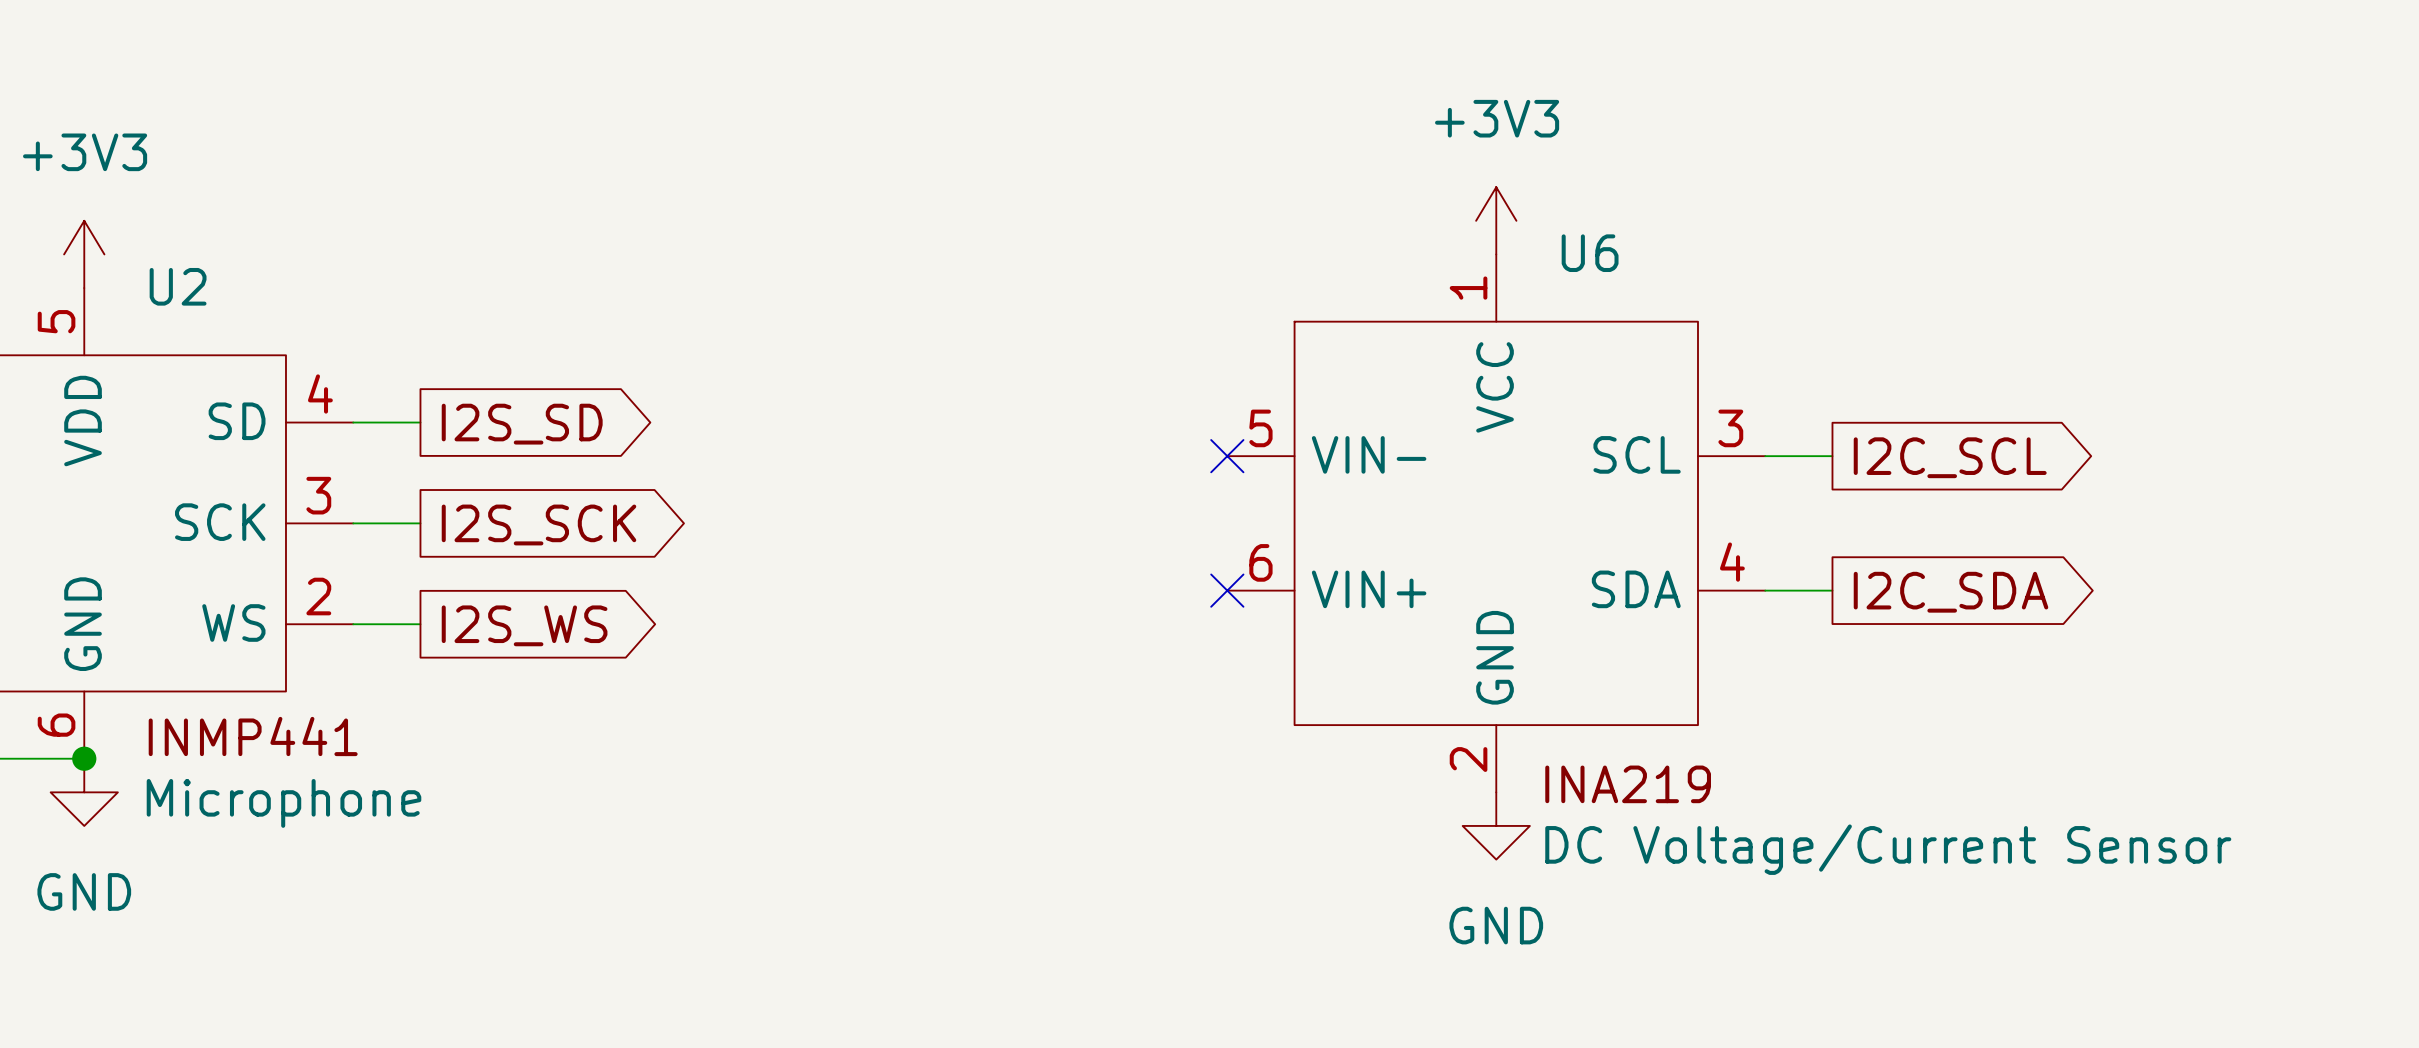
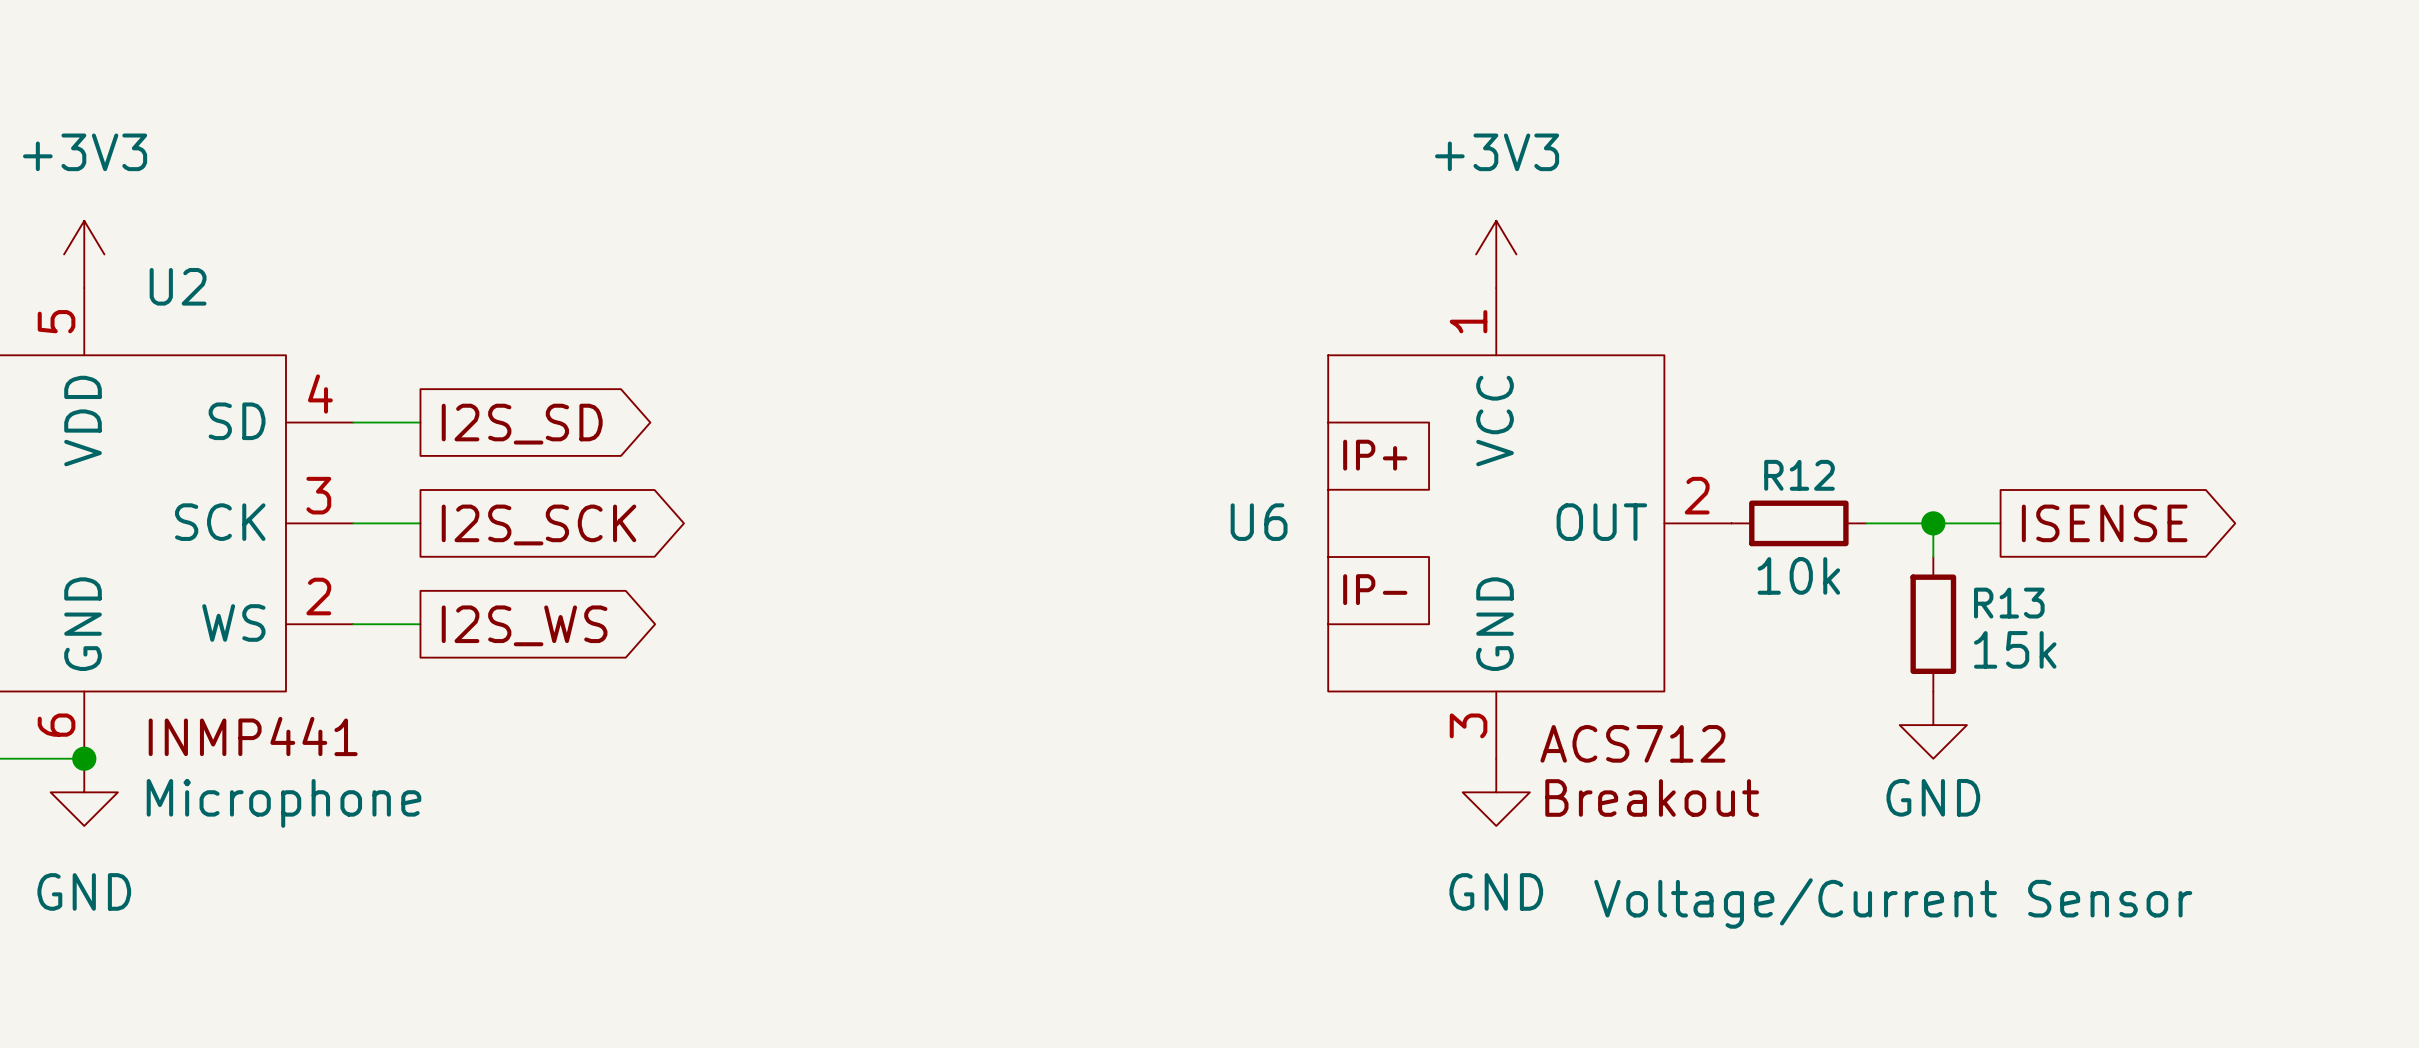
power symbol position: +3V3 (1496, 220) -> +3V3 (1496, 254)
U6 name position: U6 (1590, 253) -> U6 (1259, 522)
U6 symbol: [1227, 254, 1766, 793] -> [1328, 288, 1732, 759]
no-connect mark: (1227, 456) -> none
wire: (1765, 456) (1832, 456) -> none
global label: I2C_SCL (1950, 457) -> none
R12: none -> 10k (1798, 523)
wire: none -> (1866, 523) (2000, 523)
wire: none -> (1933, 523) (1933, 557)
junction: none -> (1933, 523)
global label: none -> ISENSE (2104, 523)
no-connect mark: (1227, 590) -> none
wire: (1765, 590) (1832, 590) -> none
global label: I2C_SDA (1950, 592) -> none
R13: none -> 15k (1933, 624)
power symbol: none -> GND (1933, 725)
power symbol position: GND (1496, 825) -> GND (1496, 792)
U6 text: DC Voltage/Current Sensor (1888, 849) -> Voltage/Current Sensor (1893, 903)

